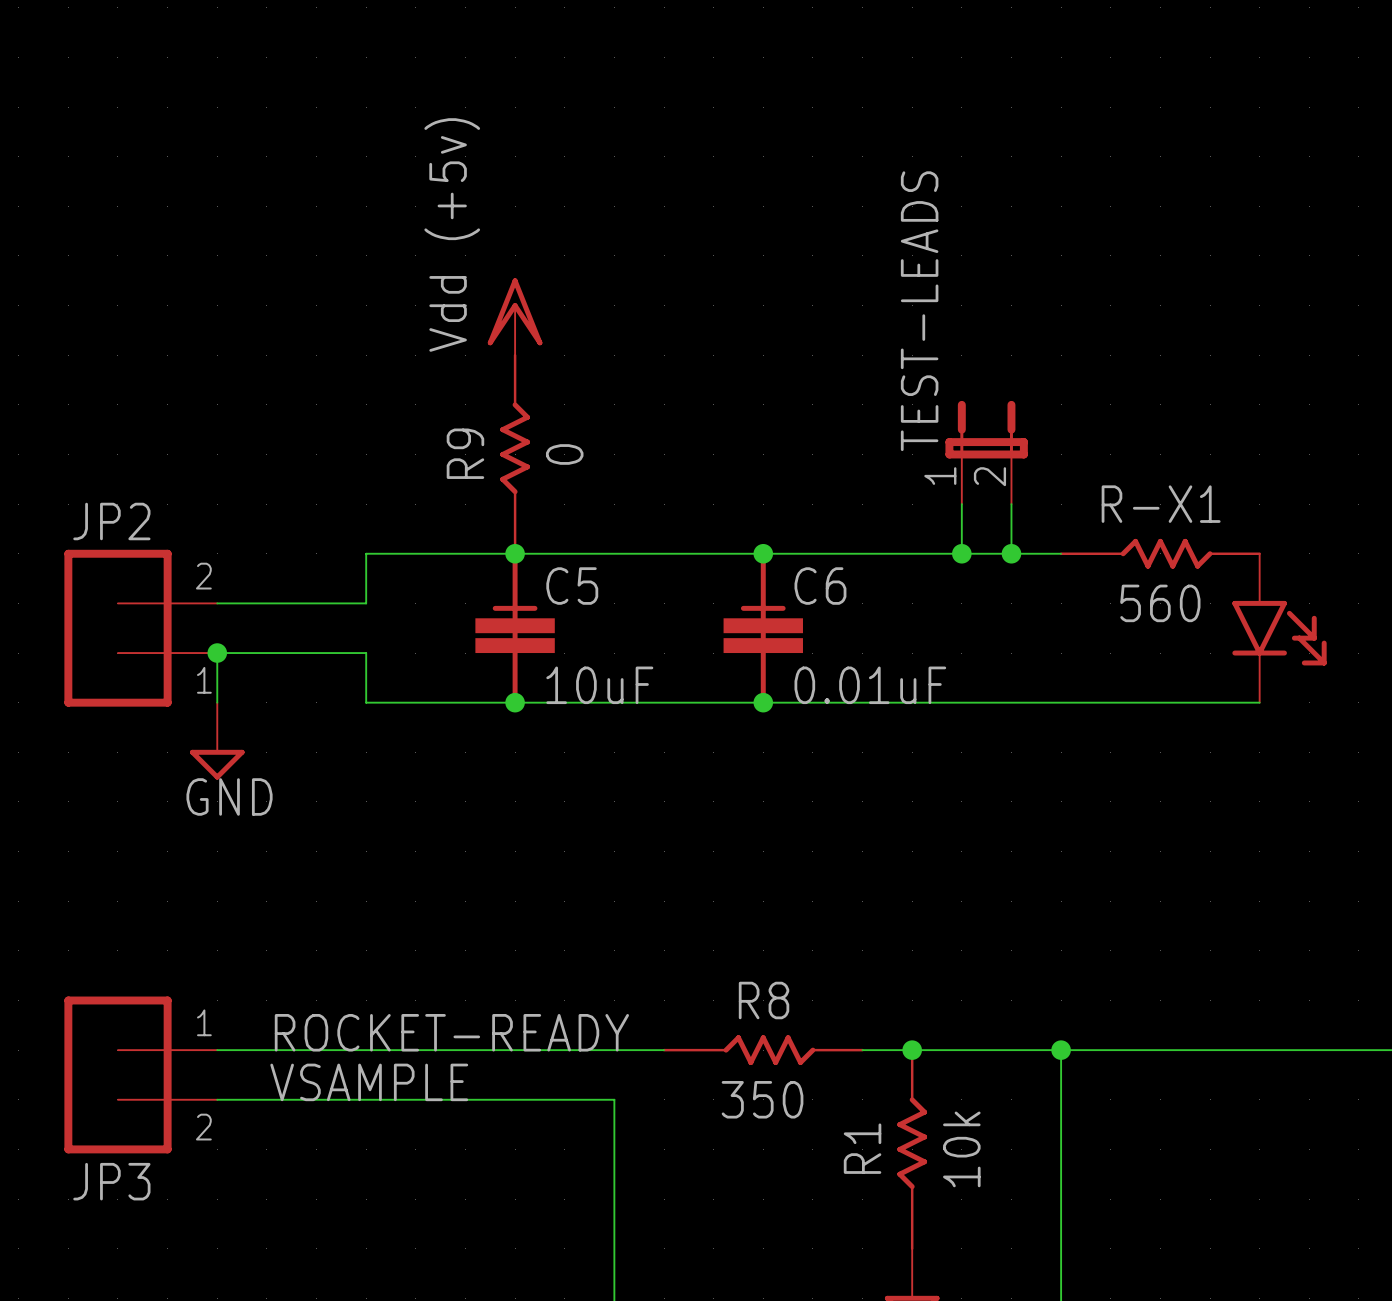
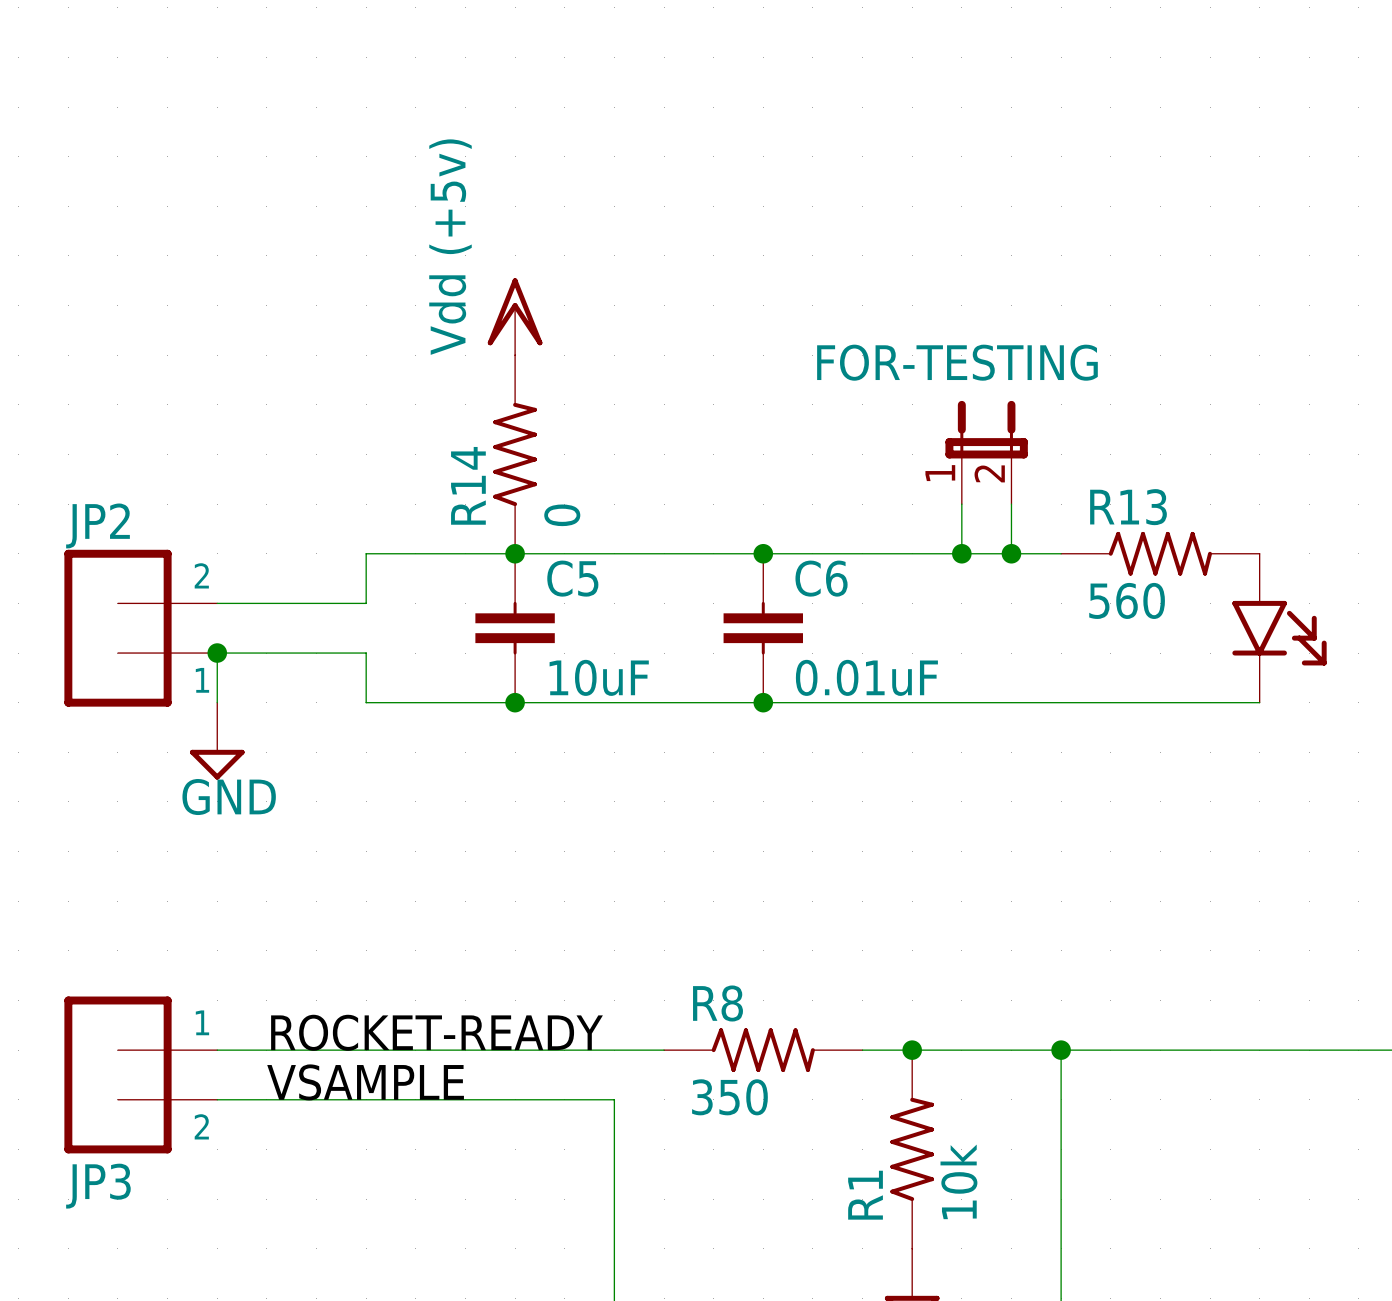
TEST-LEADS name: TEST-LEADS (919, 311) -> FOR-TESTING (957, 362)
R9: 0 (515, 454) -> none
R14: none -> 0 (515, 454)
C5 symbol: [475, 551, 555, 706] -> [475, 553, 555, 703]
C6 symbol: [723, 551, 803, 706] -> [723, 553, 803, 703]
R-X1: 560 (1160, 553) -> none
R13: none -> 560 (1160, 553)
R8 symbol: [662, 1035, 864, 1066] -> [664, 1028, 863, 1072]
R1 symbol: [897, 1048, 928, 1250] -> [890, 1050, 935, 1249]

